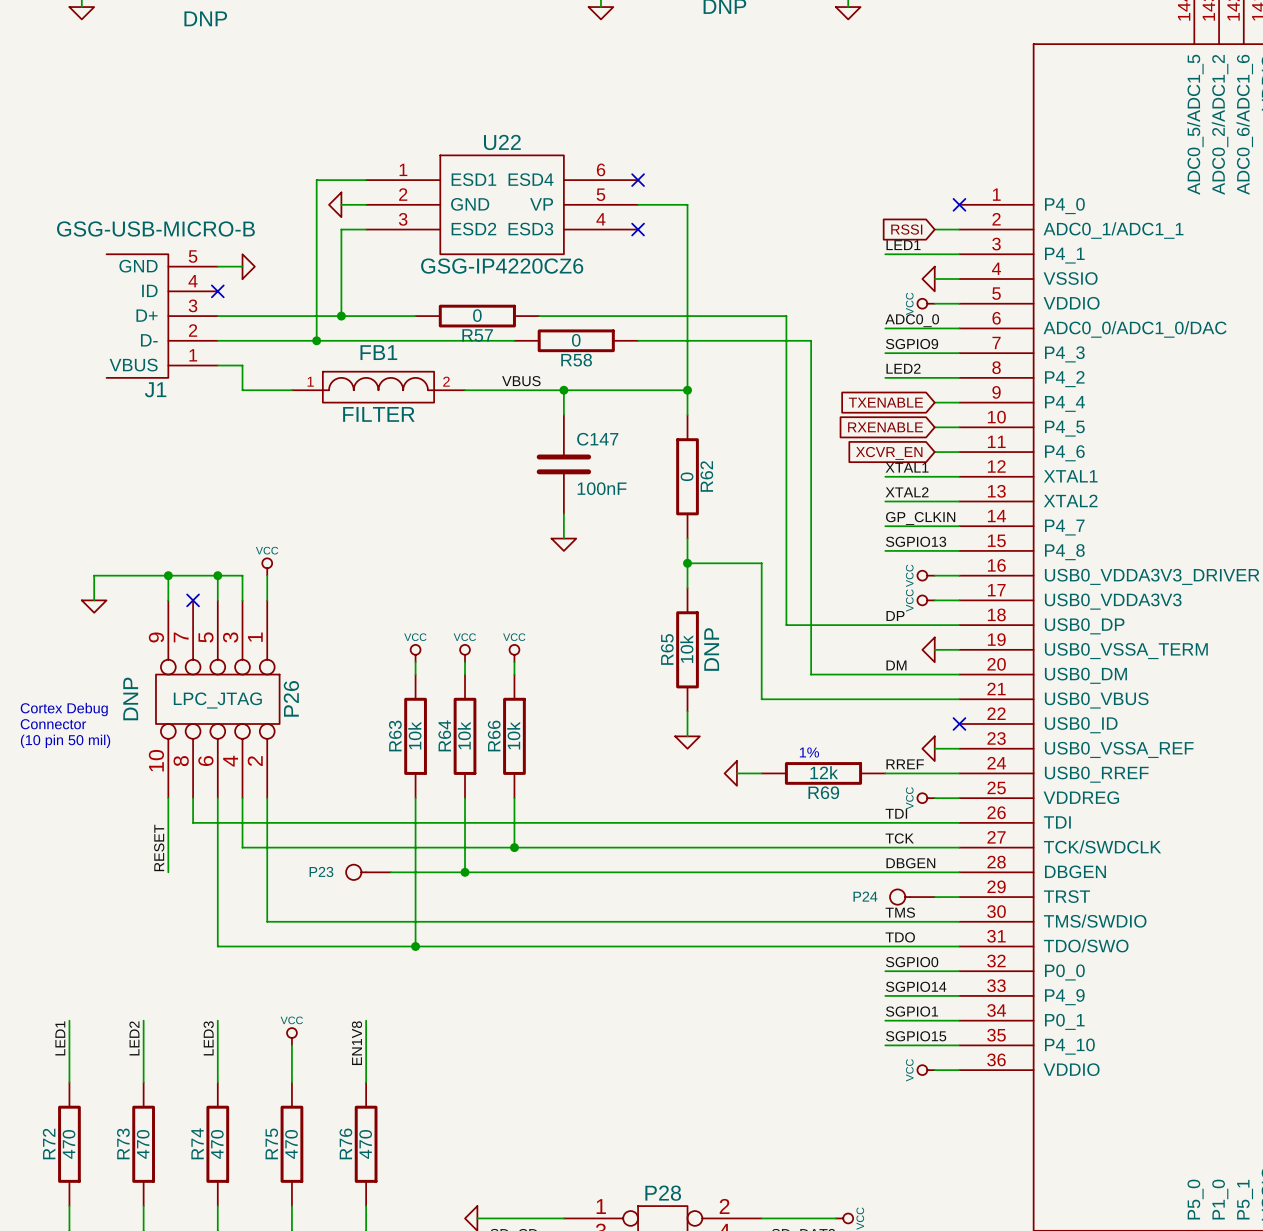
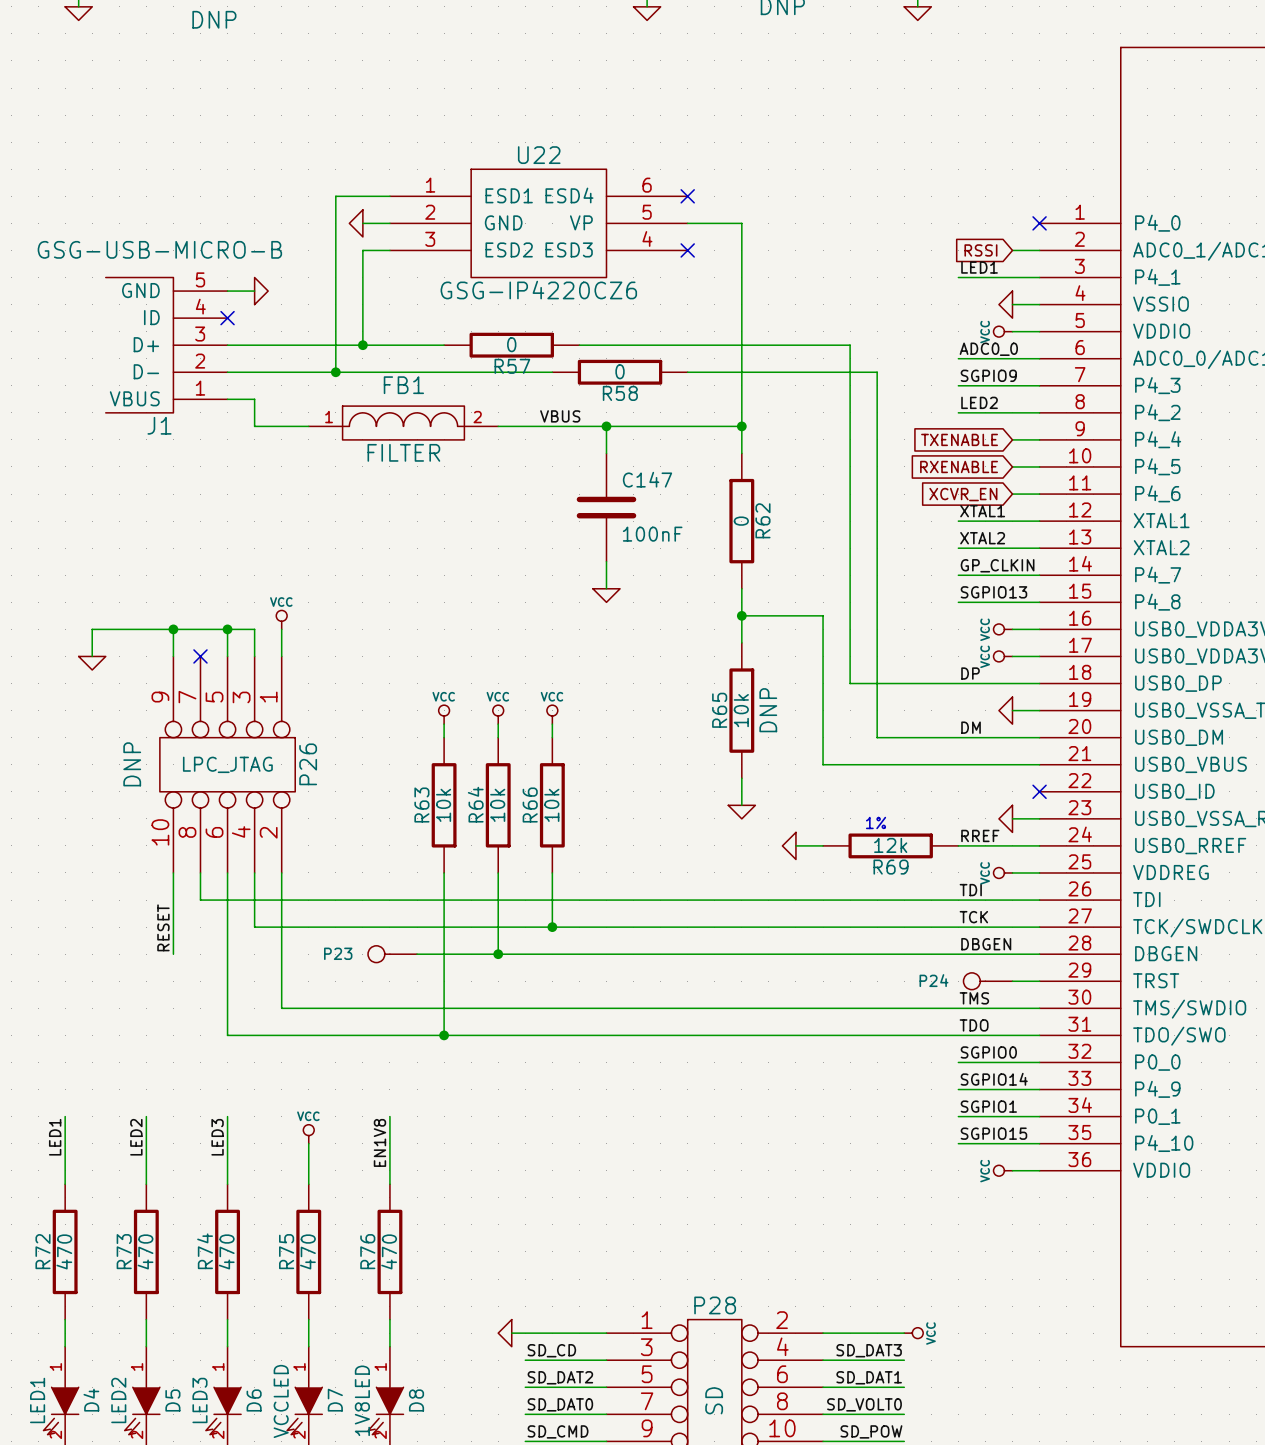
text: Cortex Debug (64, 709) -> none
text: Connector (53, 724) -> none
text: (10 pin 50 mil) (65, 741) -> none

